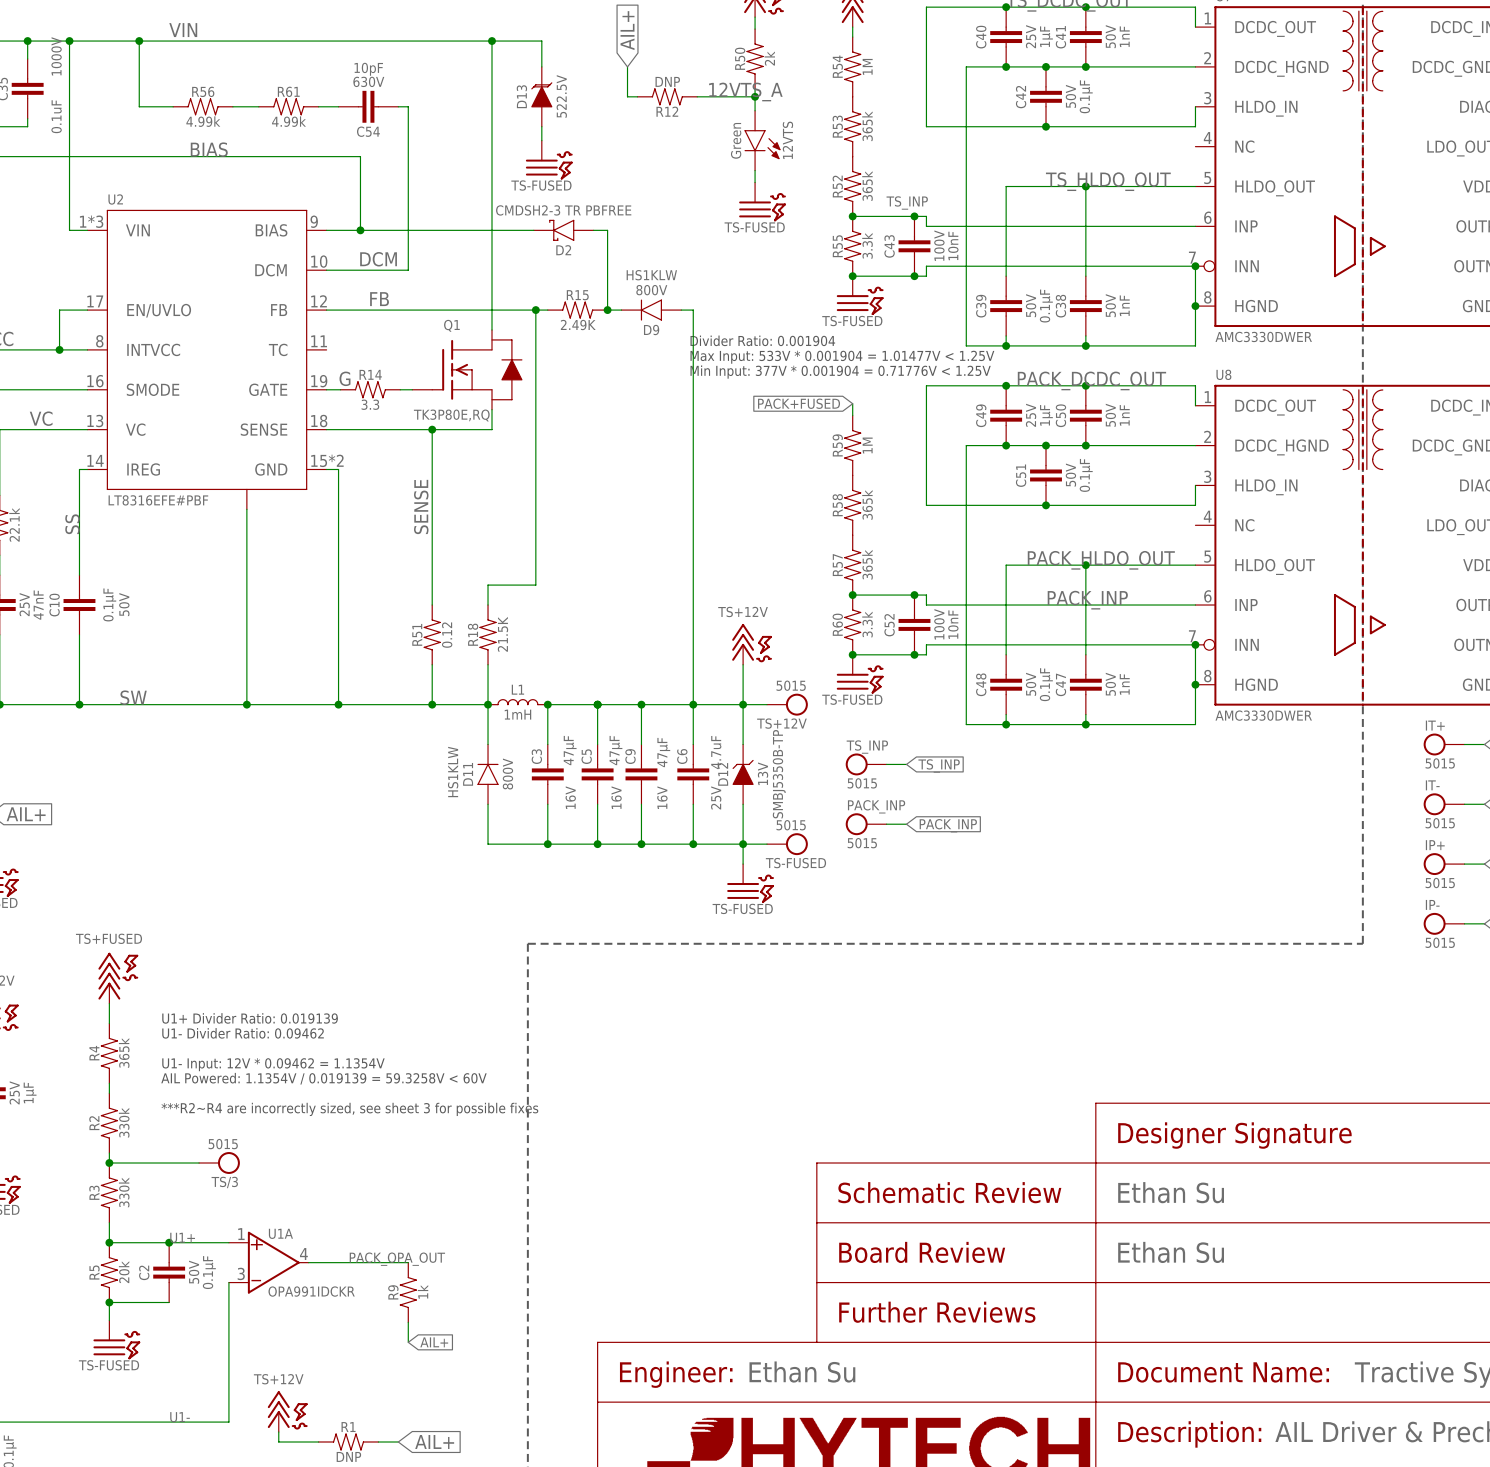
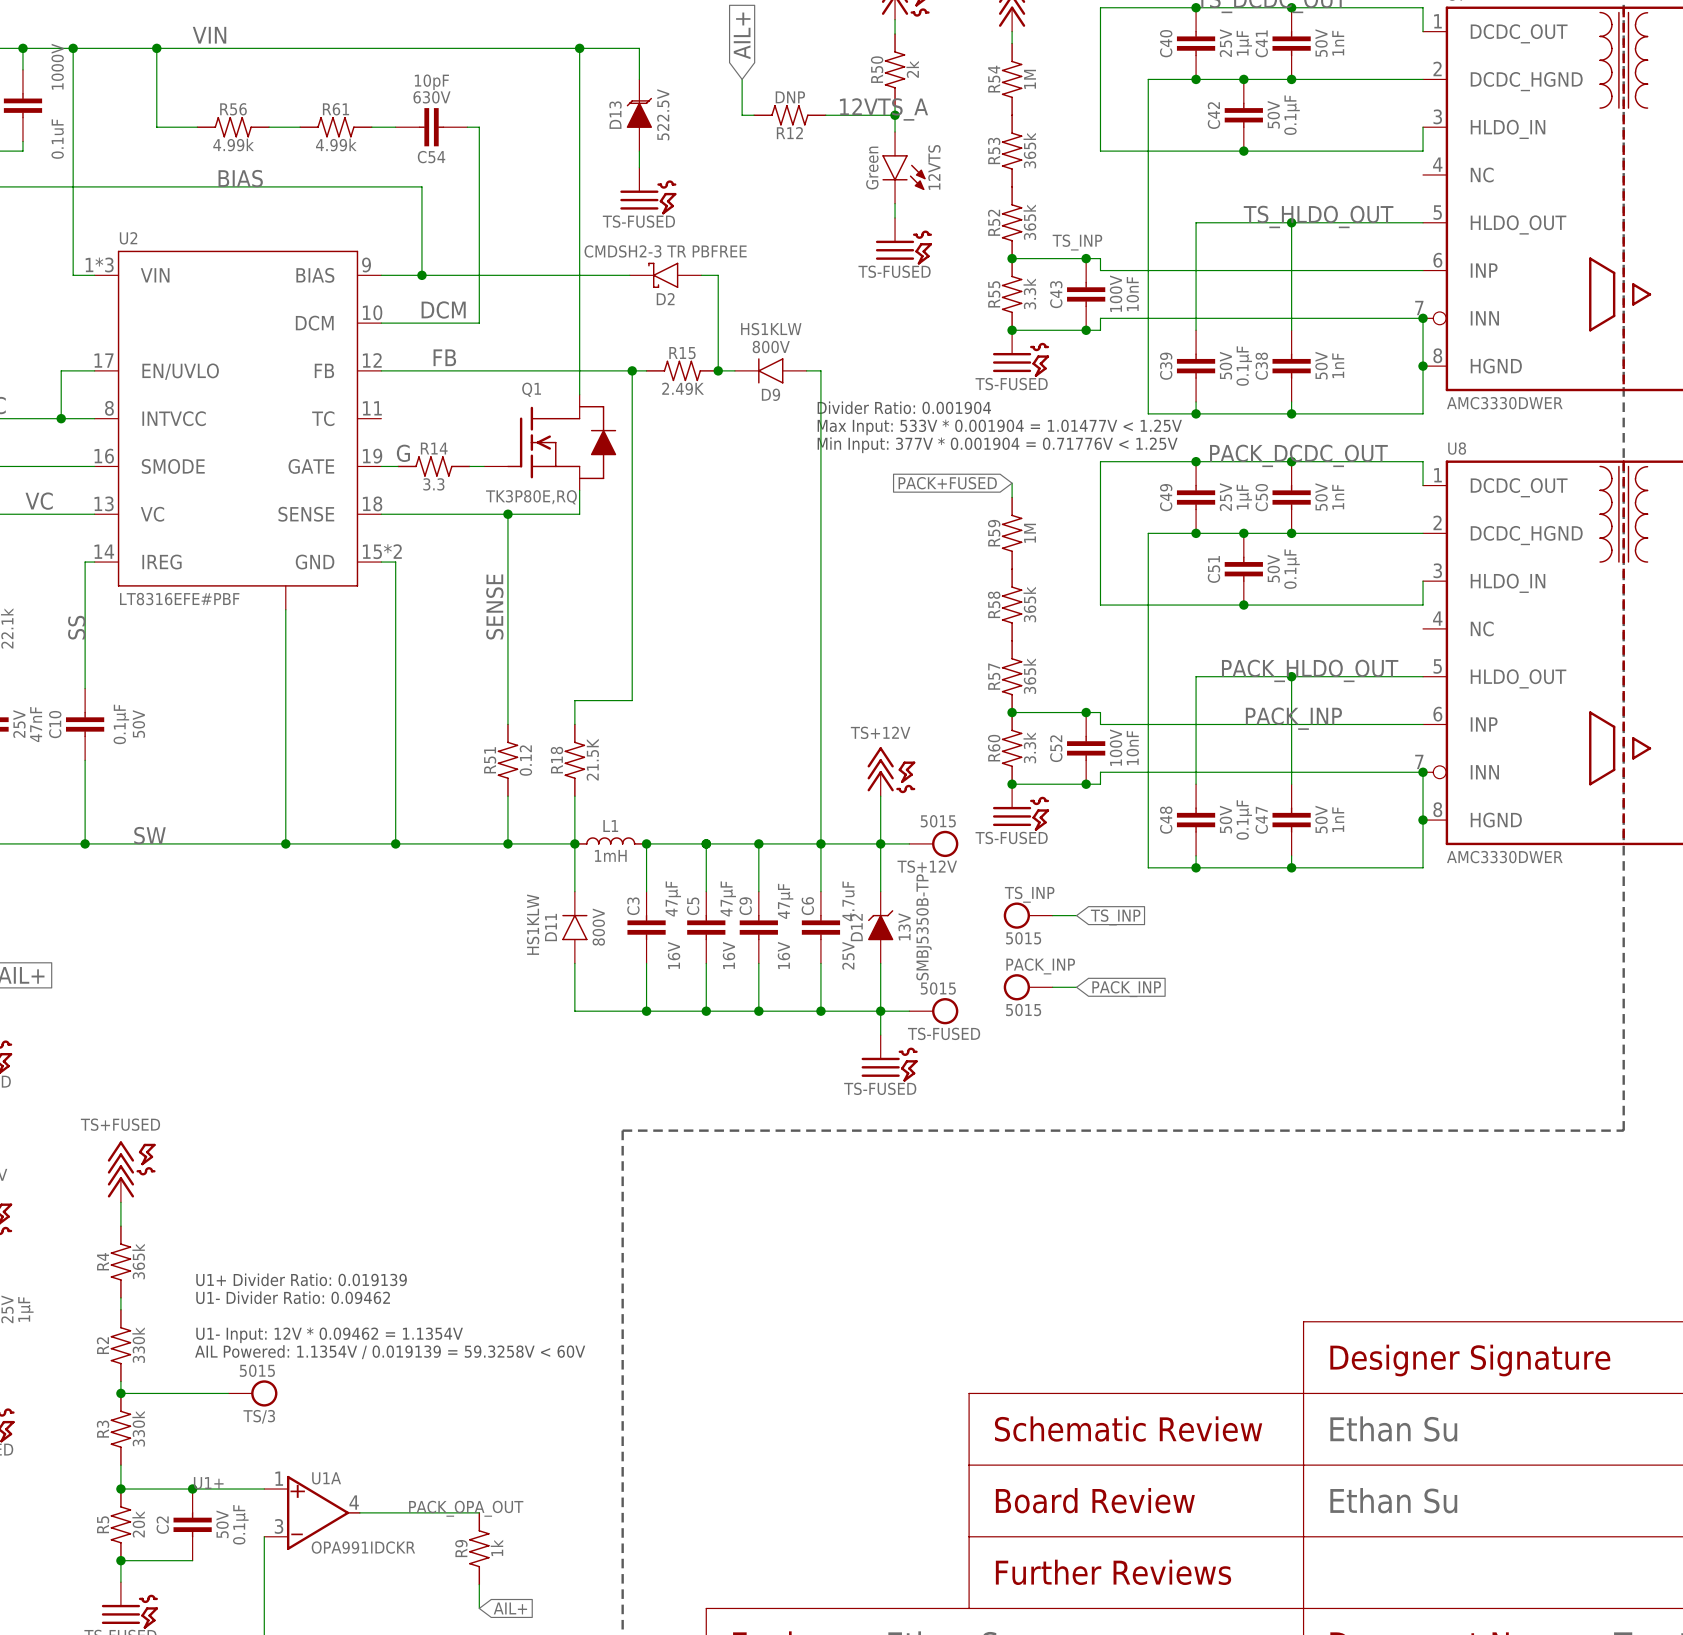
text position: U1+ Divider Ratio: 0.019139 (250, 1018) -> U1+ Divider Ratio: 0.019139 (301, 1279)
text position: U1- Divider Ratio: 0.09462 (243, 1033) -> U1- Divider Ratio: 0.09462 (293, 1297)
text position: U1- Input: 12V * 0.09462 = 1.1354V (273, 1064) -> U1- Input: 12V * 0.09462 = 1.1354V (329, 1335)
text position: AIL Powered: 1.1354V / 0.019139 = 59.3258V < 60V (323, 1078) -> AIL Powered: 1.1354V / 0.019139 = 59.3258V < 60V (390, 1352)
text: ***R2~R4 are incorrectly sized, see sheet 3 for possible fixes (349, 1109) -> none

